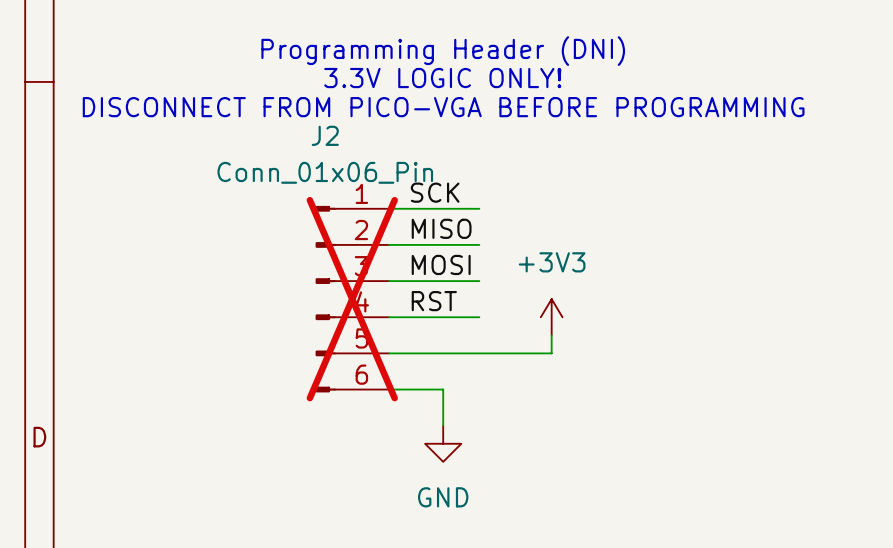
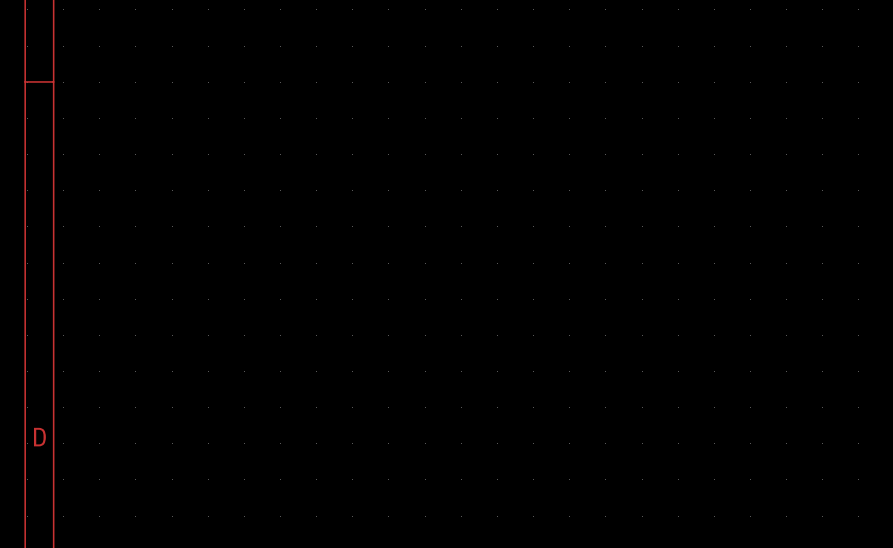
text: Programming Header (DNI) (443, 51) -> none
text: 3.3V LOGIC ONLY! (442, 78) -> none
text: DISCONNECT FROM PICO-VGA BEFORE PROGRAMMING (443, 107) -> none
label: SCK (435, 192) -> none
wire: (388, 208) (479, 208) -> none
label: MISO (441, 228) -> none
wire: (388, 244) (479, 244) -> none
label: MOSI (441, 264) -> none
wire: (388, 281) (479, 281) -> none
J2: Conn_01x06_Pin (352, 299) -> none
label: RST (434, 301) -> none
wire: (388, 317) (479, 317) -> none
power symbol: +3V3 (551, 317) -> none
wire: (551, 335) (551, 353) (388, 353) -> none
wire: (388, 389) (443, 389) (443, 425) -> none
power symbol: GND (443, 443) -> none

